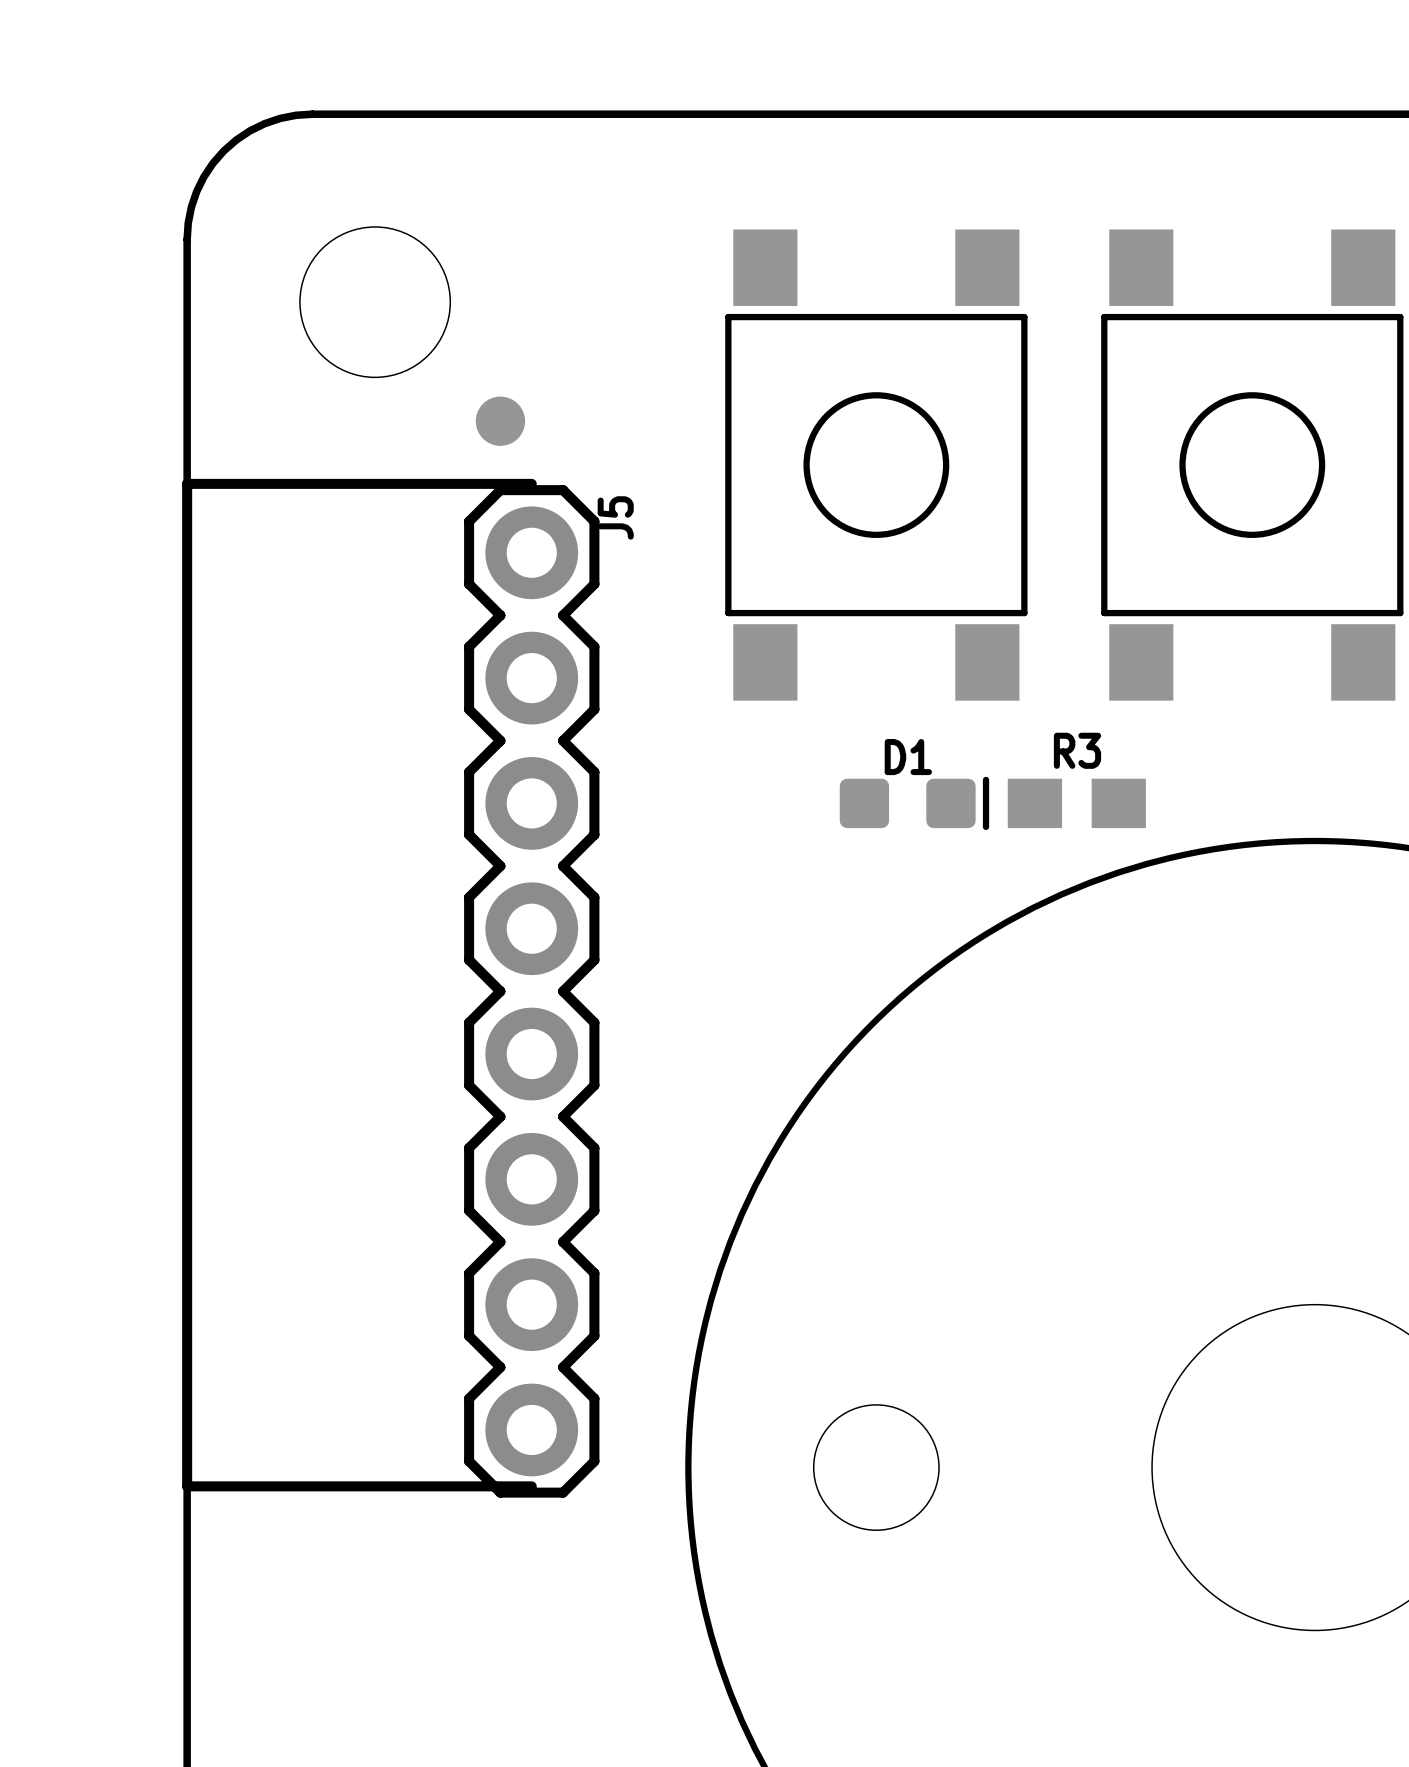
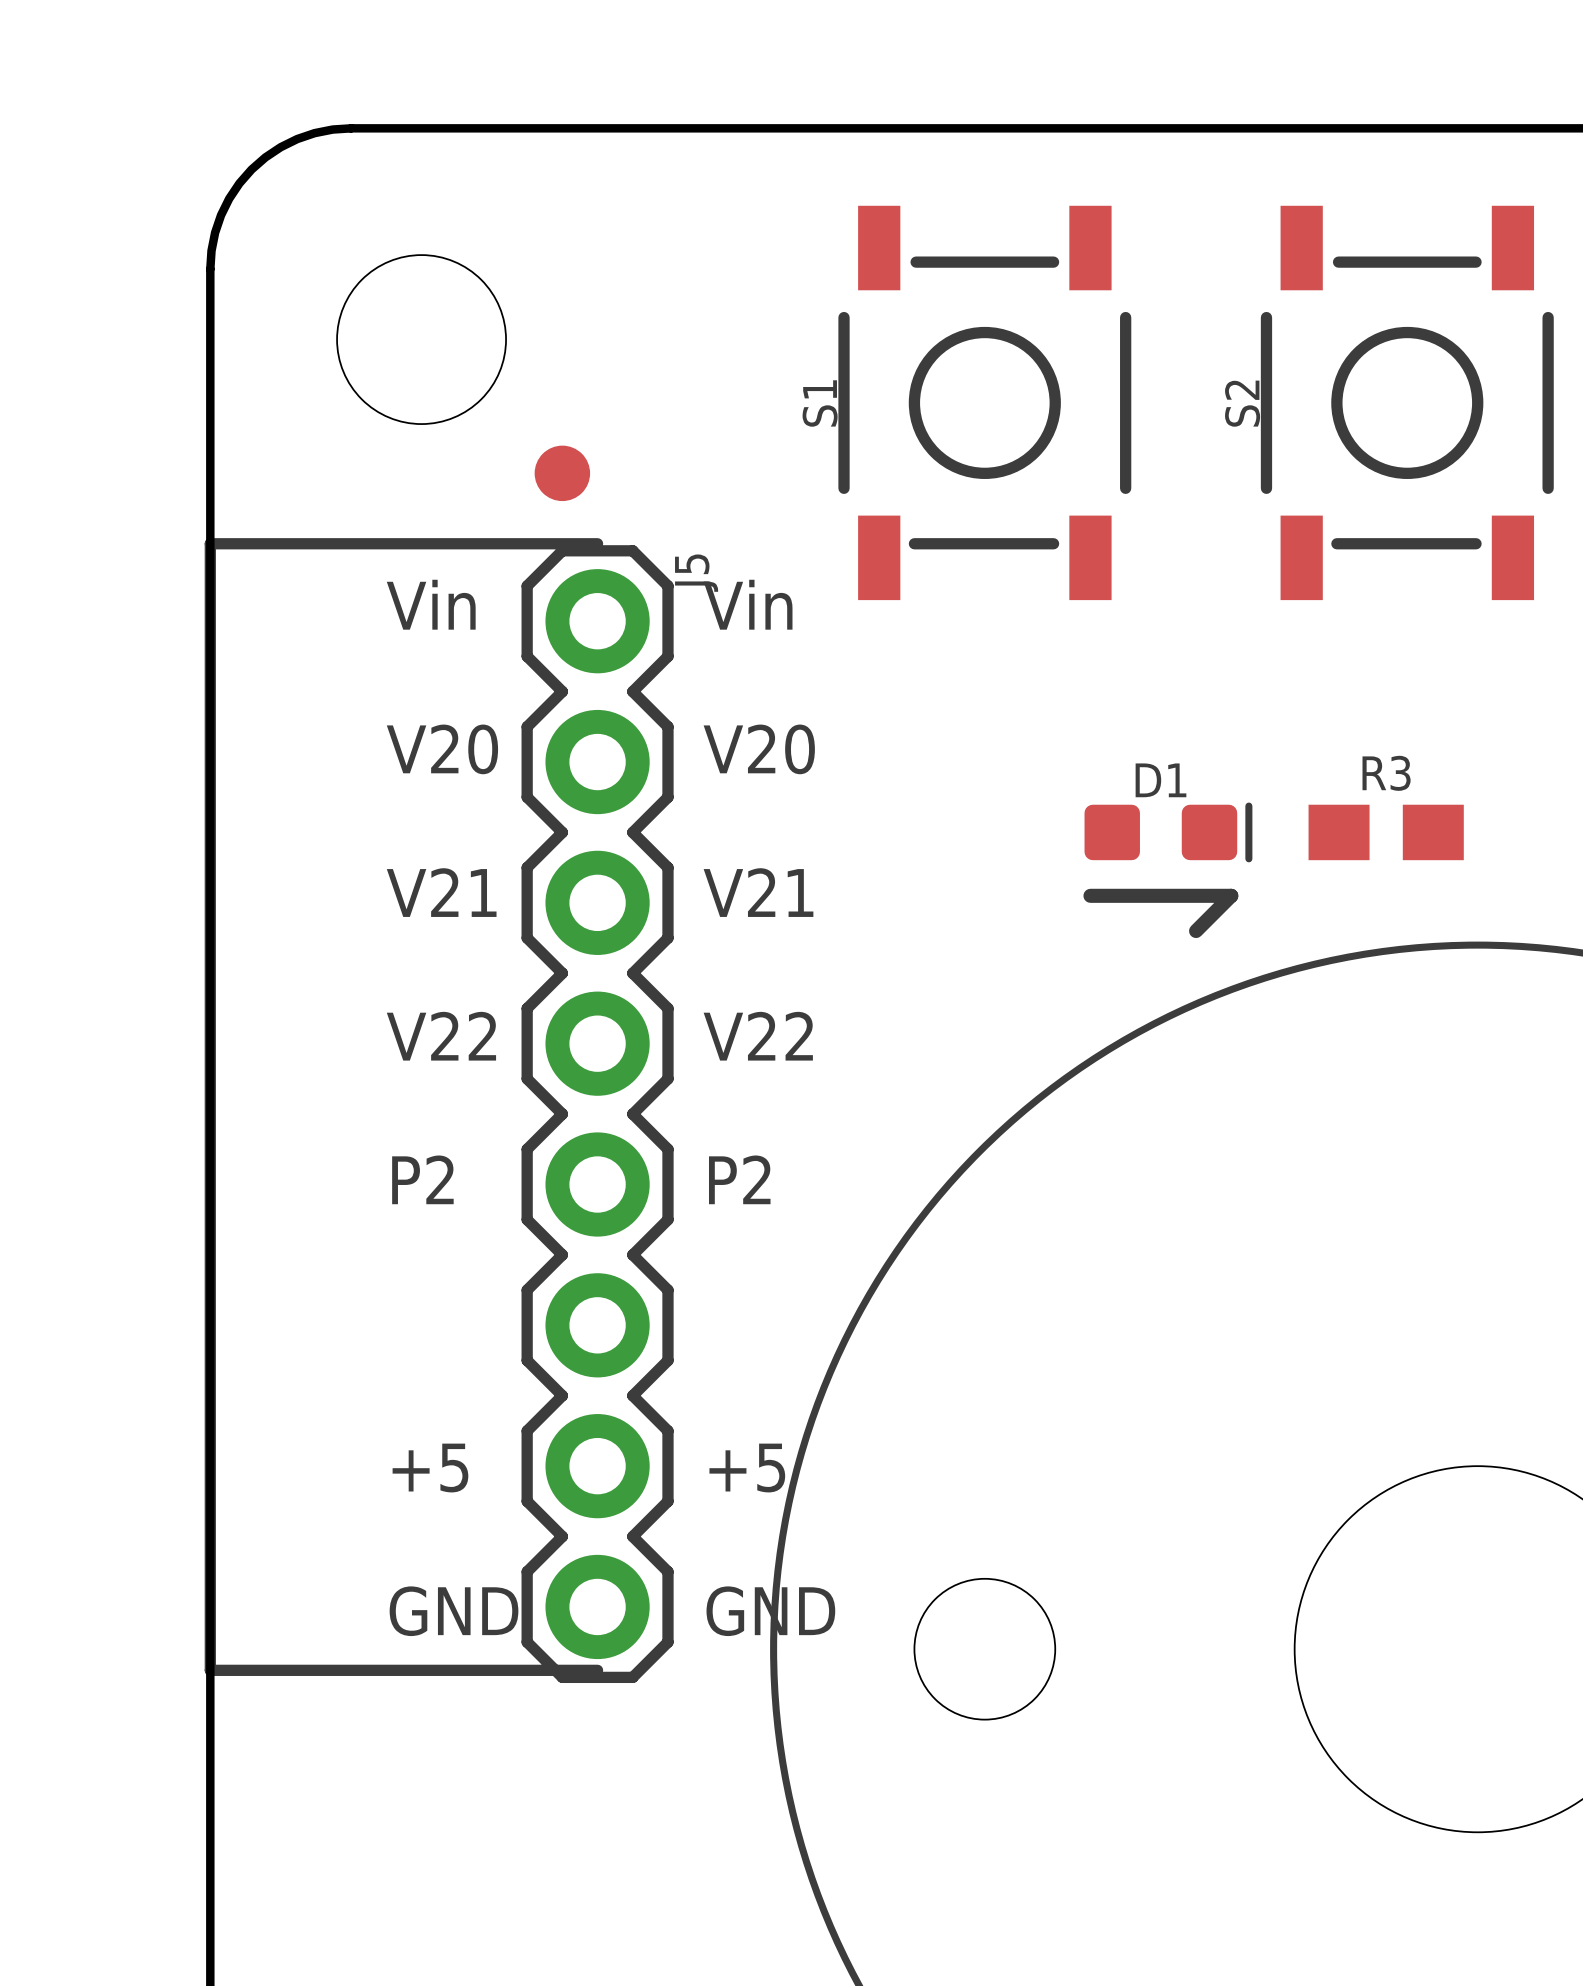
S1: none -> (984, 402)
S2: none -> (1407, 402)
part: (876, 465) -> none
part: (1252, 465) -> none
text: none -> Vin (431, 604)
text: none -> Vin (748, 604)
text: none -> V20 (442, 749)
text: none -> V20 (759, 749)
text: none -> V21 (441, 892)
text: none -> V21 (758, 892)
line: none -> (1090, 895) (1231, 895) (1196, 931)
D1 position: (914, 803) -> (1168, 832)
R3 position: (1076, 803) -> (1386, 832)
text: none -> V22 (441, 1036)
text: none -> V22 (758, 1036)
text: none -> P2 (422, 1179)
text: none -> P2 (739, 1179)
text: none -> +5 (430, 1468)
text: none -> +5 (747, 1468)
text: none -> GND (454, 1611)
text: none -> GND (770, 1611)

